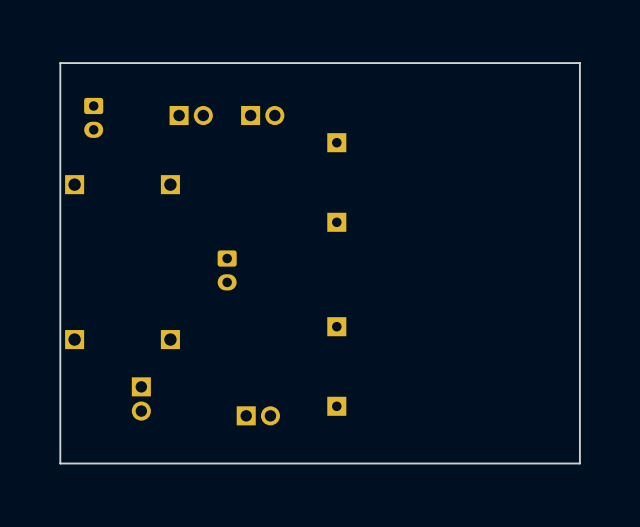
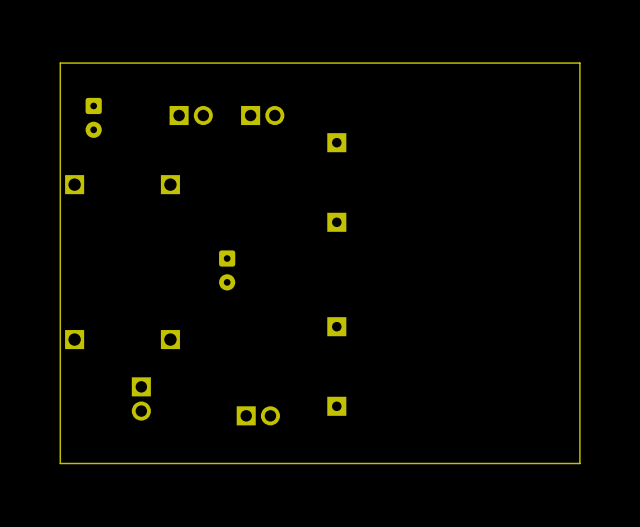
part footprint: [84, 97, 104, 138] -> [85, 97, 102, 138]
part footprint: [217, 250, 237, 291] -> [219, 250, 236, 291]

